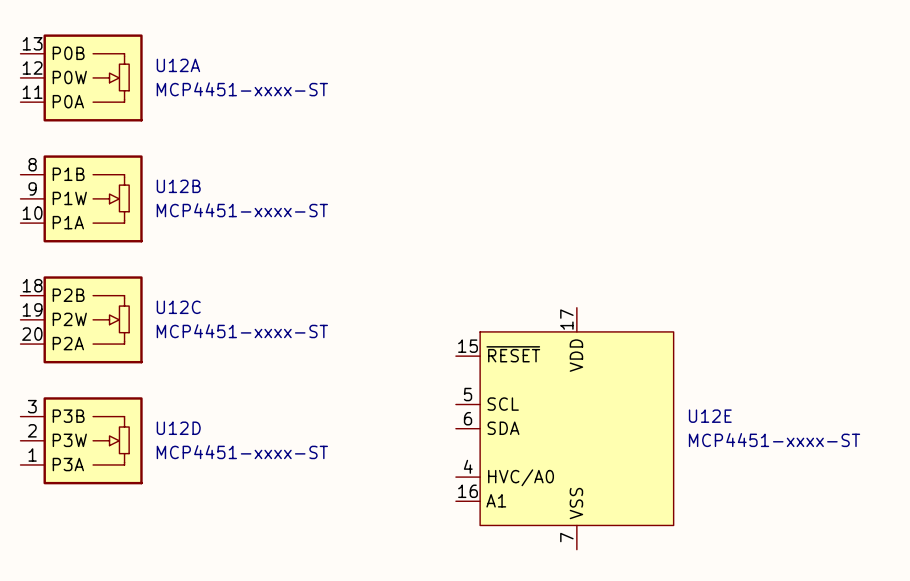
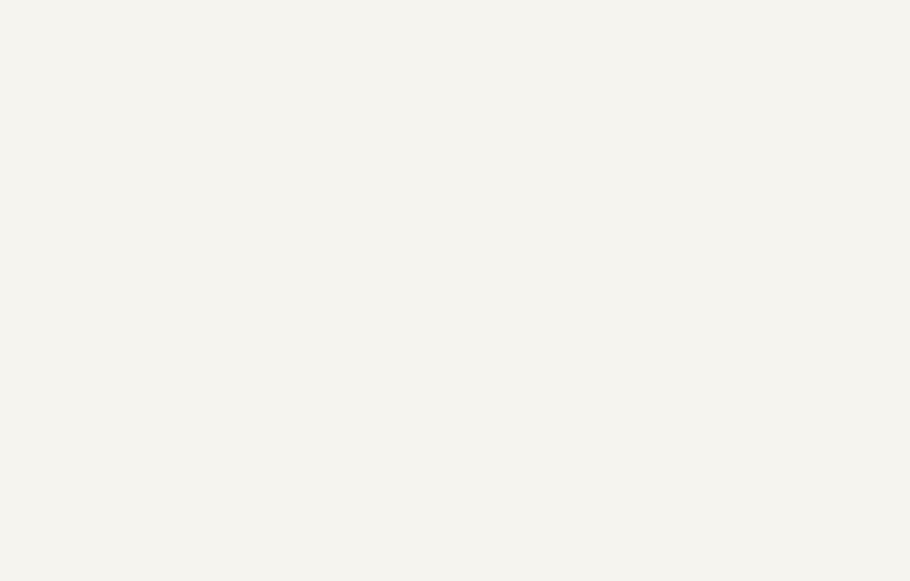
U12A: MCP4451-xxxx-ST (81, 77) -> none
U12B: MCP4451-xxxx-ST (81, 198) -> none
U12C: MCP4451-xxxx-ST (81, 319) -> none
U12E: MCP4451-xxxx-ST (564, 428) -> none
U12D: MCP4451-xxxx-ST (81, 440) -> none

